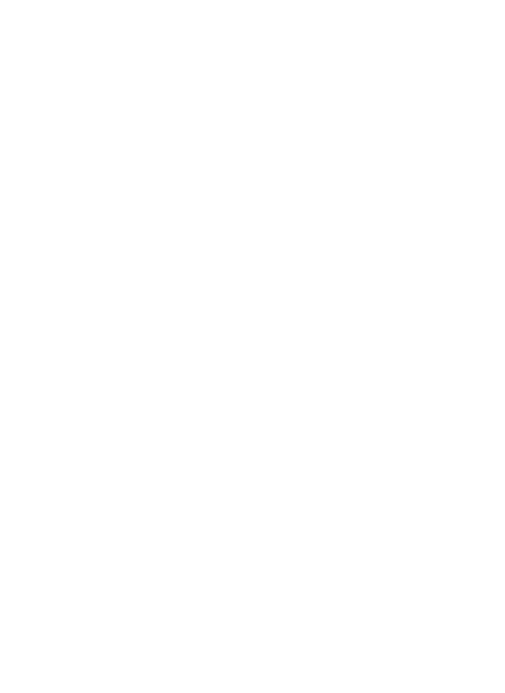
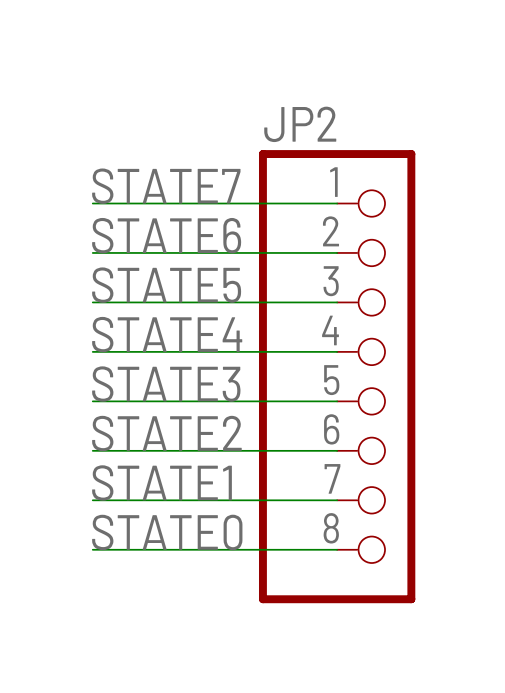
label: none -> STATE7 (166, 186)
wire: none -> (92, 203) (337, 203)
label: none -> STATE6 (166, 235)
wire: none -> (92, 252) (337, 252)
label: none -> STATE5 (166, 285)
wire: none -> (92, 302) (337, 302)
label: none -> STATE4 (167, 334)
wire: none -> (92, 351) (337, 351)
JP2: none -> (337, 376)
label: none -> STATE3 (166, 384)
wire: none -> (92, 401) (337, 401)
label: none -> STATE2 (166, 433)
wire: none -> (92, 450) (337, 450)
label: none -> STATE1 (162, 482)
wire: none -> (92, 500) (337, 500)
label: none -> STATE0 (167, 532)
wire: none -> (92, 549) (337, 549)

